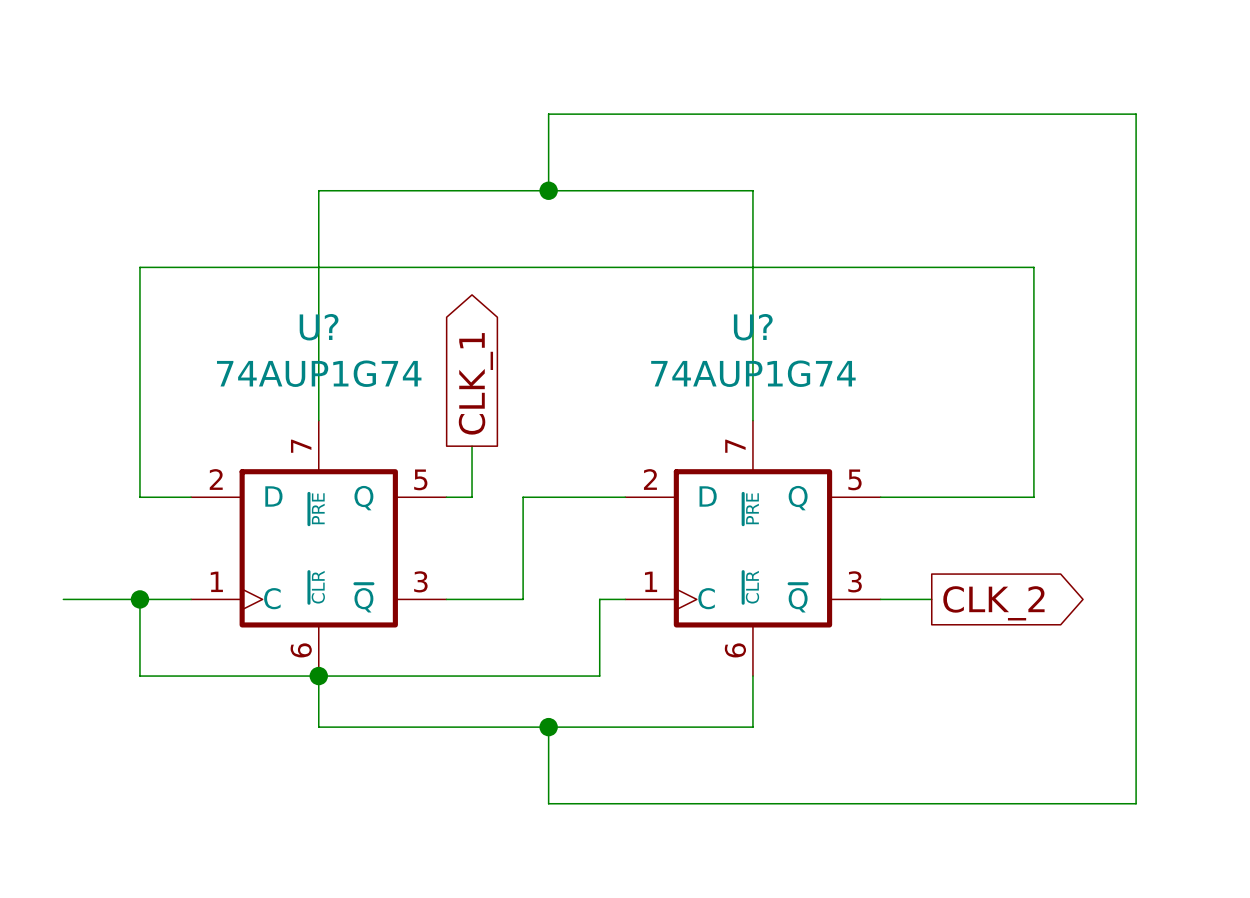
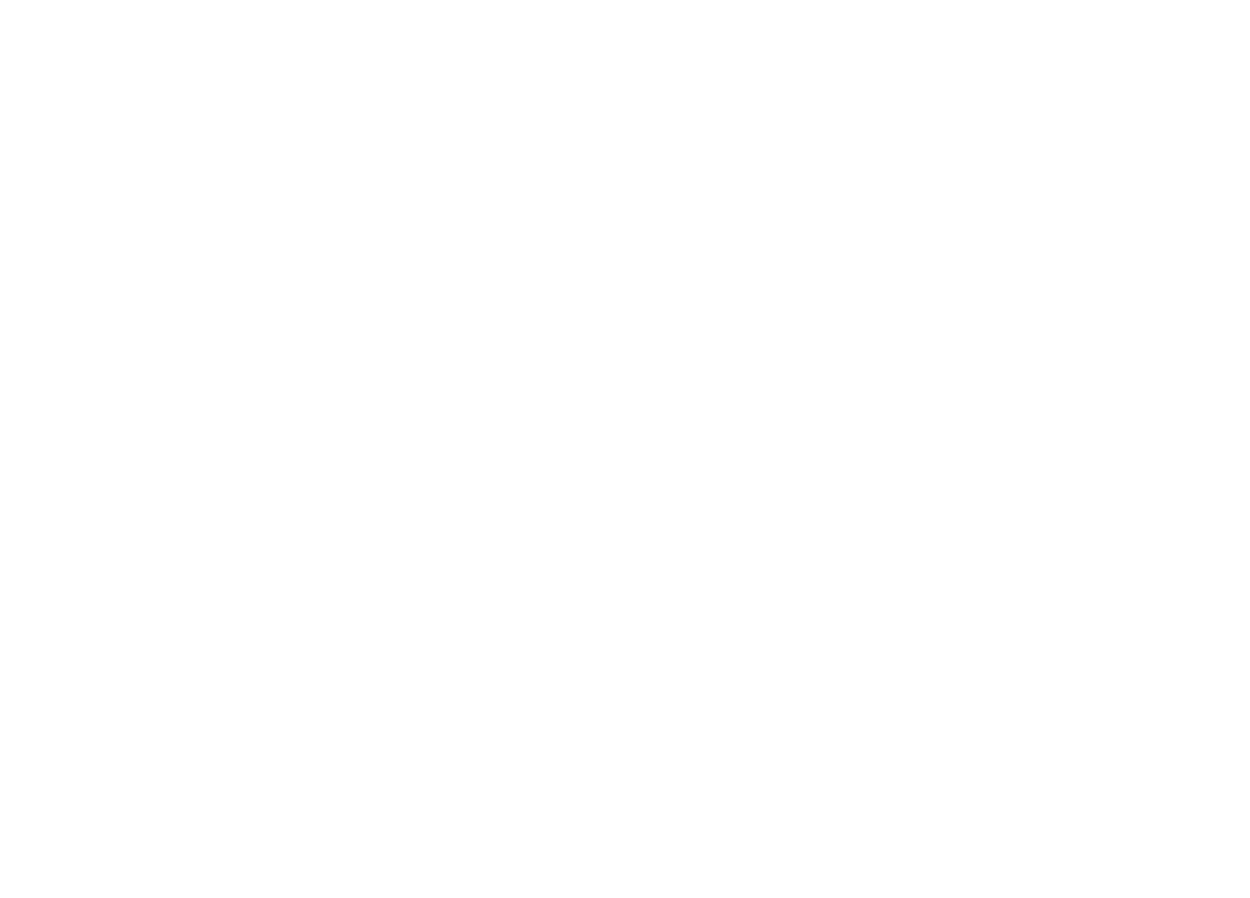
wire: (548, 190) (548, 114) (1136, 114) (1136, 803) (548, 803) (548, 727) -> none
junction: (548, 190) -> none
global label: CLK_1 (475, 383) -> none
wire: (318, 420) (318, 190) (752, 190) (752, 420) -> none
wire: (472, 446) (472, 497) (446, 497) -> none
wire: (191, 497) (139, 497) (139, 267) (1033, 267) (1033, 497) (880, 497) -> none
wire: (625, 497) (523, 497) (523, 599) (446, 599) -> none
U?: 74AUP1G74 (318, 548) -> none
U?: 74AUP1G74 (752, 548) -> none
wire: (63, 599) (191, 599) -> none
wire: (139, 599) (139, 676) (599, 676) (599, 599) (625, 599) -> none
junction: (139, 599) -> none
wire: (880, 599) (931, 599) -> none
global label: CLK_2 (993, 603) -> none
wire: (318, 676) (318, 727) (752, 727) (752, 676) -> none
junction: (318, 676) -> none
junction: (548, 727) -> none

